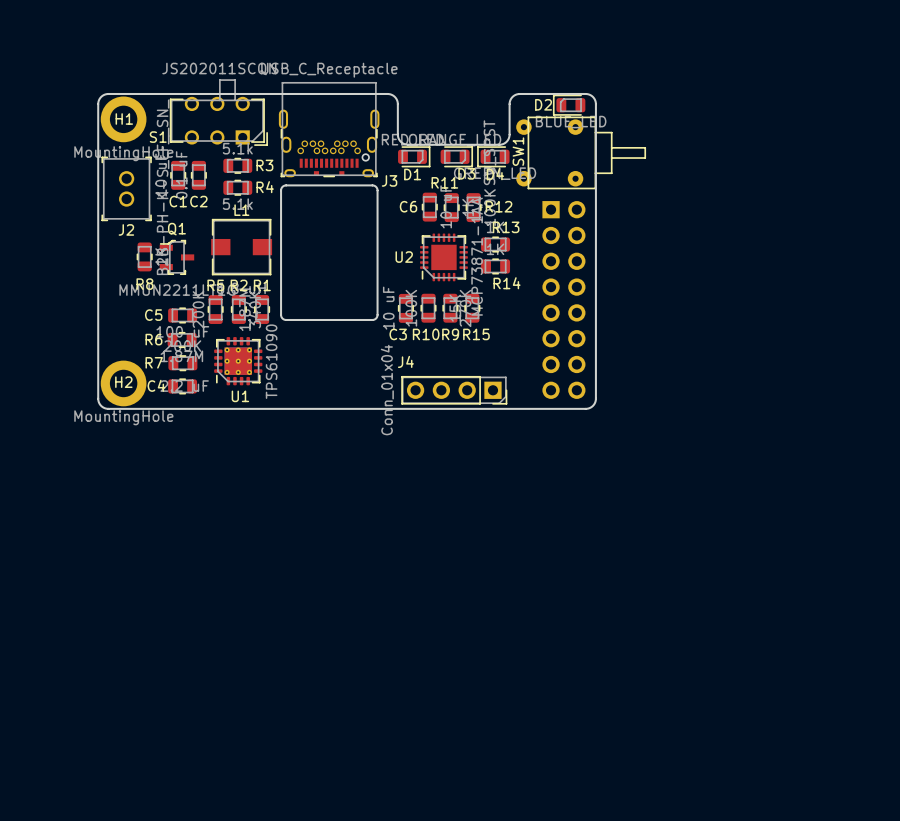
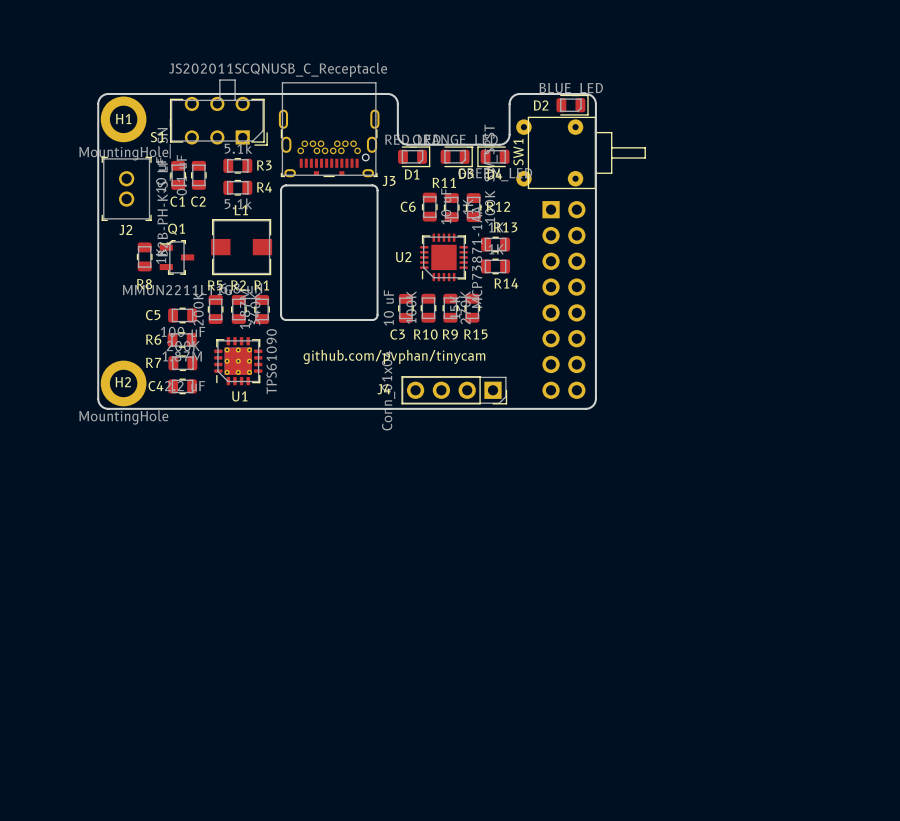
D2 rotation: 0° (569, 105) -> 180° (572, 105)
text: none -> github.com/pvphan/tinycam (394, 356)
J4 name position: J4 (405, 361) -> J4 (383, 389)

